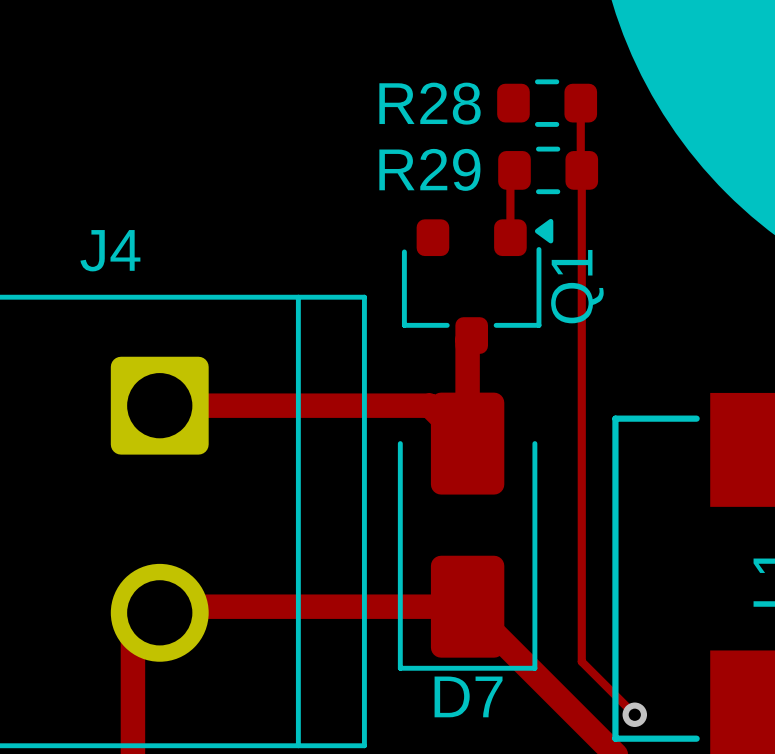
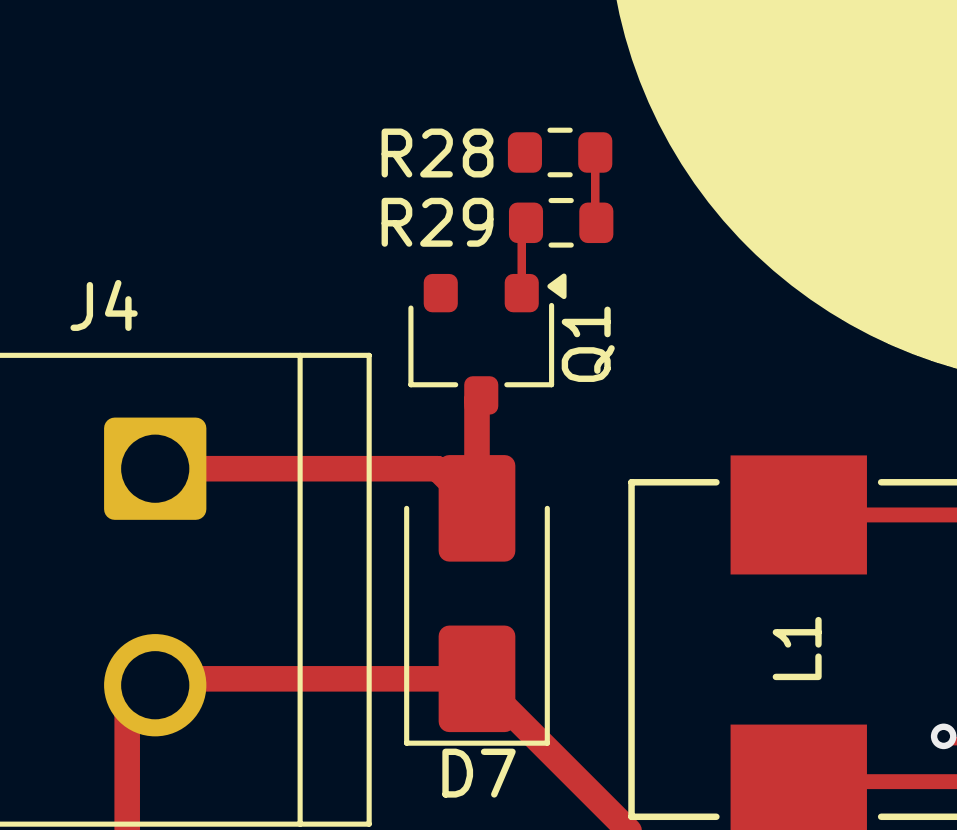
track: (581, 170) (581, 661) (634, 714) -> none
via: (634, 714) -> none

